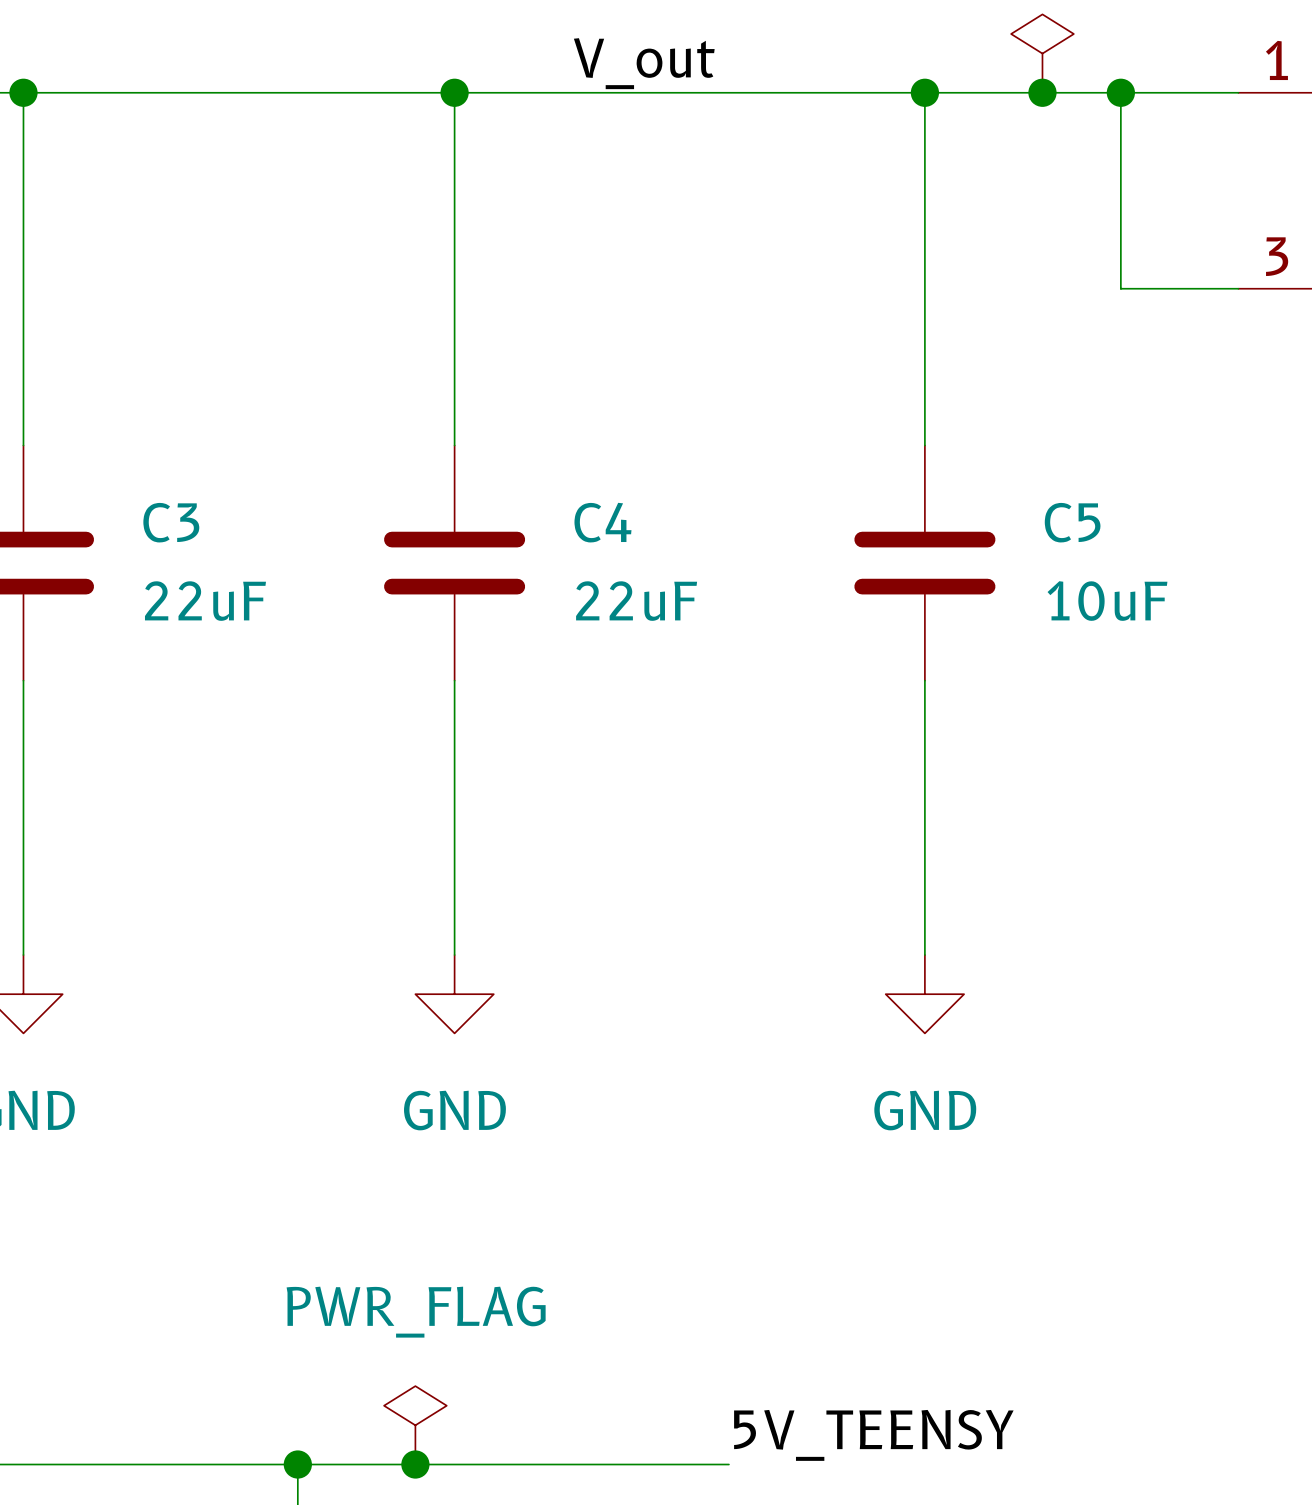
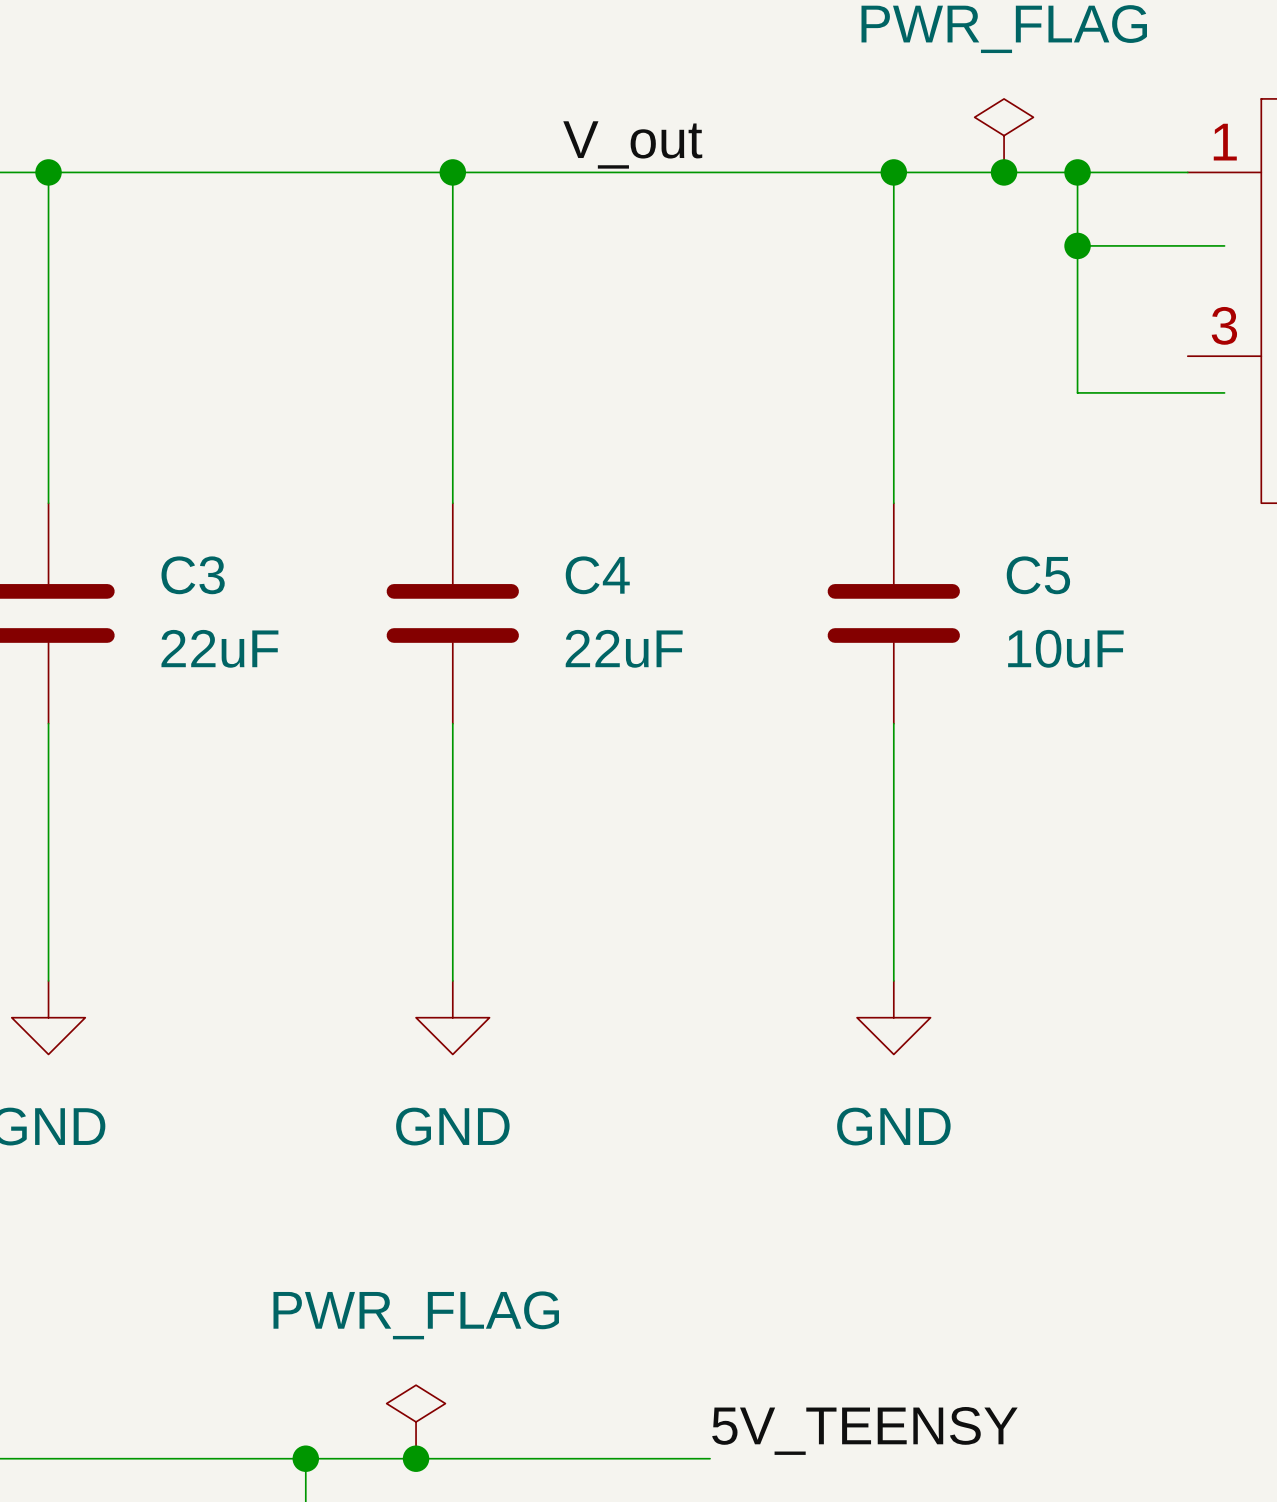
wire: none -> (1077, 245) (1224, 245)
junction: none -> (1077, 245)
wire: (1120, 288) (1238, 288) -> (1077, 356) (1077, 392) (1224, 392)

